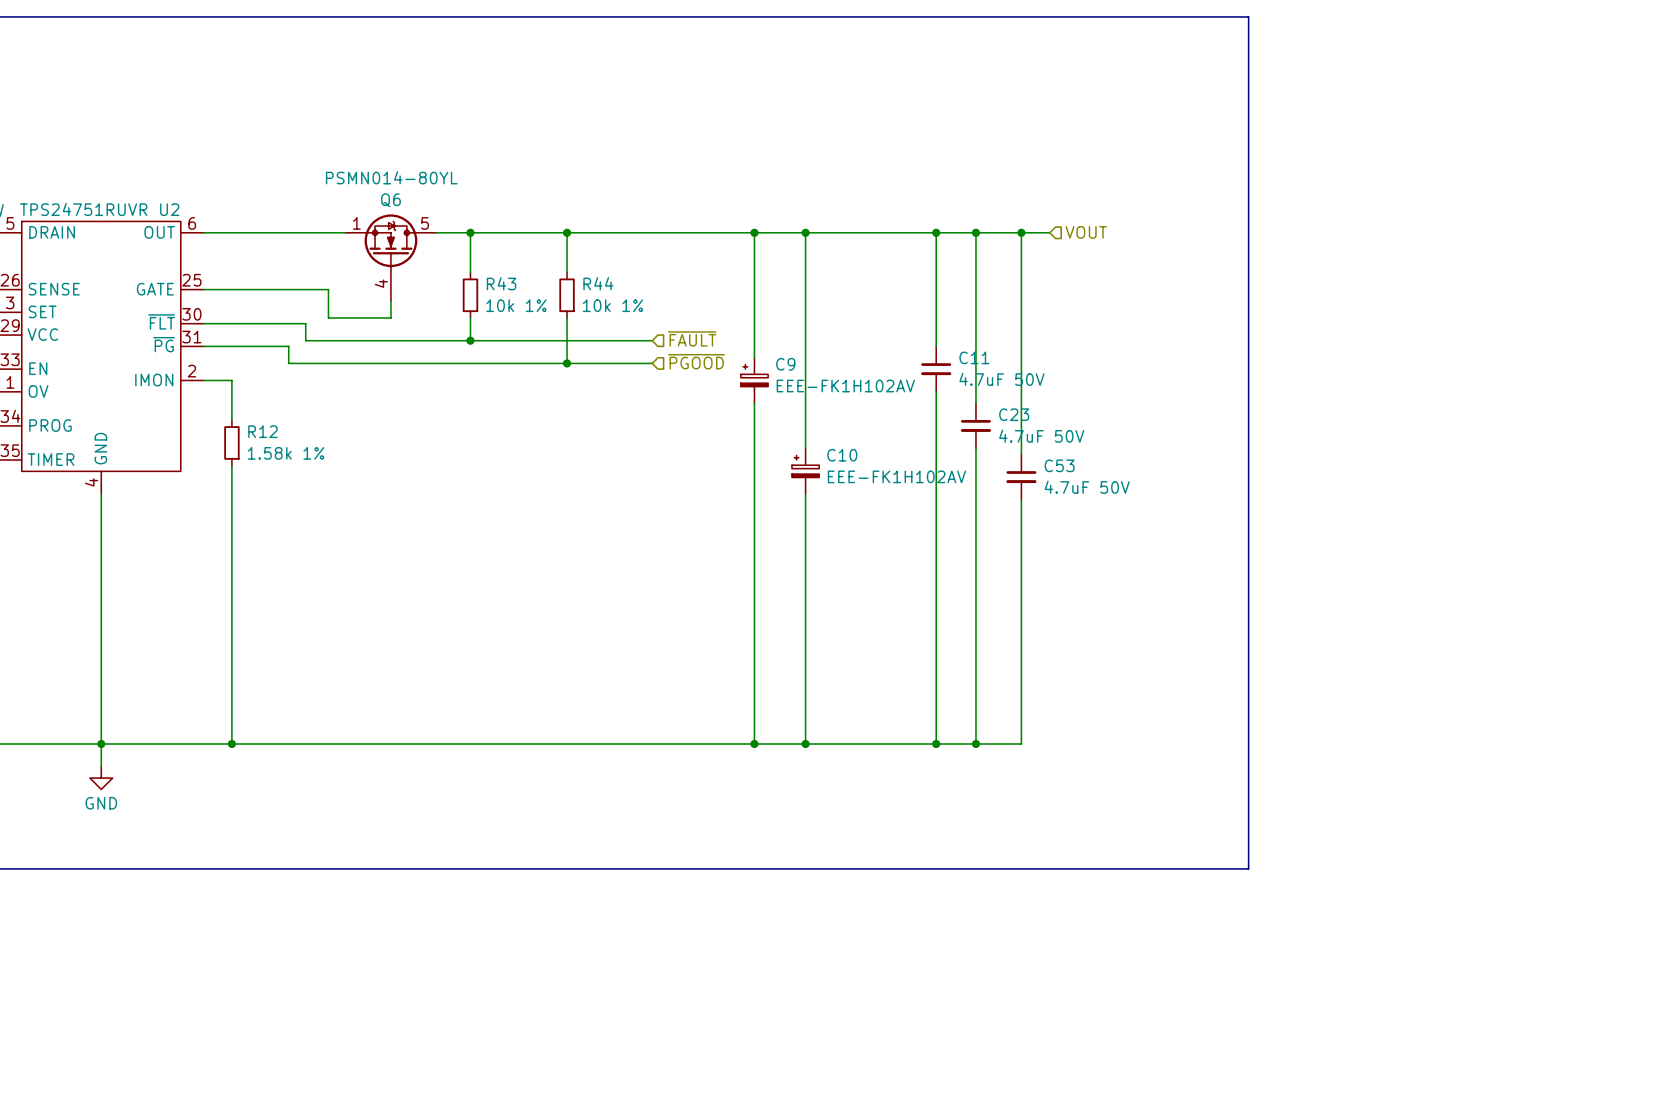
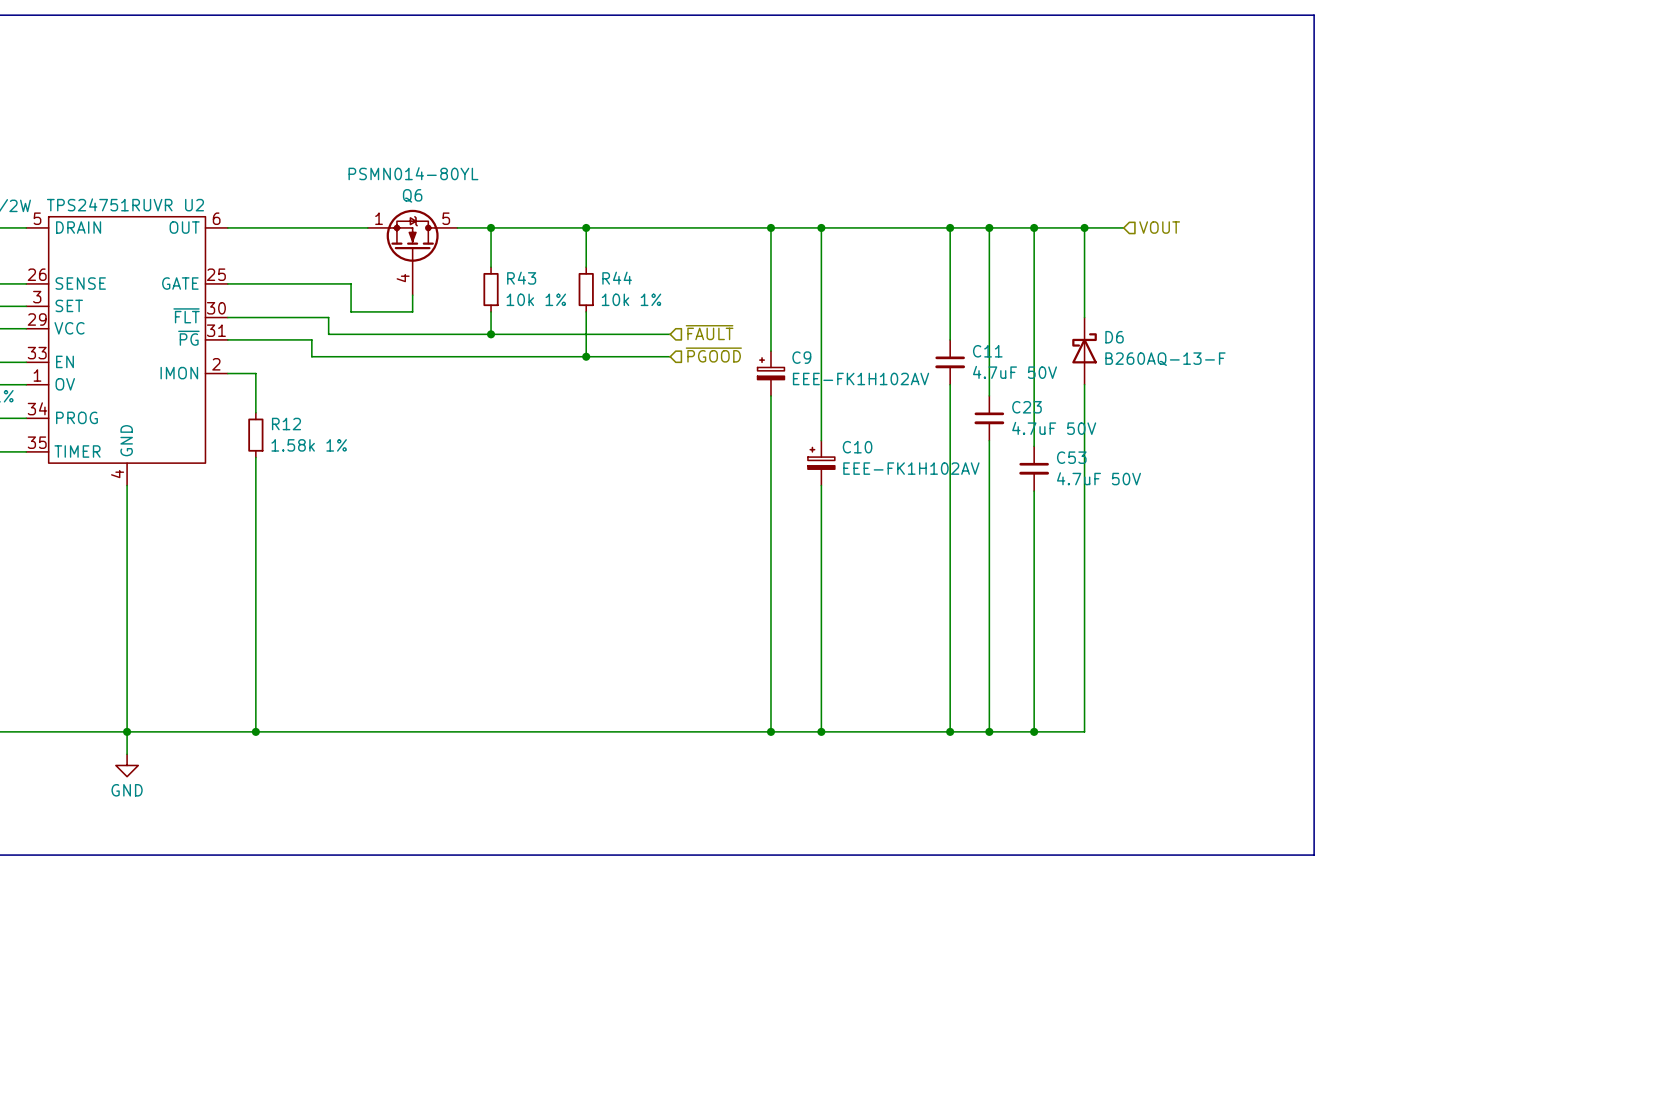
line: (1248, 16) (1248, 868) -> (1258, 15) (1314, 15) (1314, 855) (1258, 855)
wire: none -> (1062, 227) (1123, 227)
wire: none -> (1084, 227) (1084, 317)
junction: none -> (1084, 227)
hierarchical label position: VOUT (1086, 232) -> VOUT (1159, 227)
D6: none -> B260AQ-13-F (1084, 351)
wire: none -> (1084, 384) (1084, 731) (1034, 731)
junction: none -> (1034, 731)

